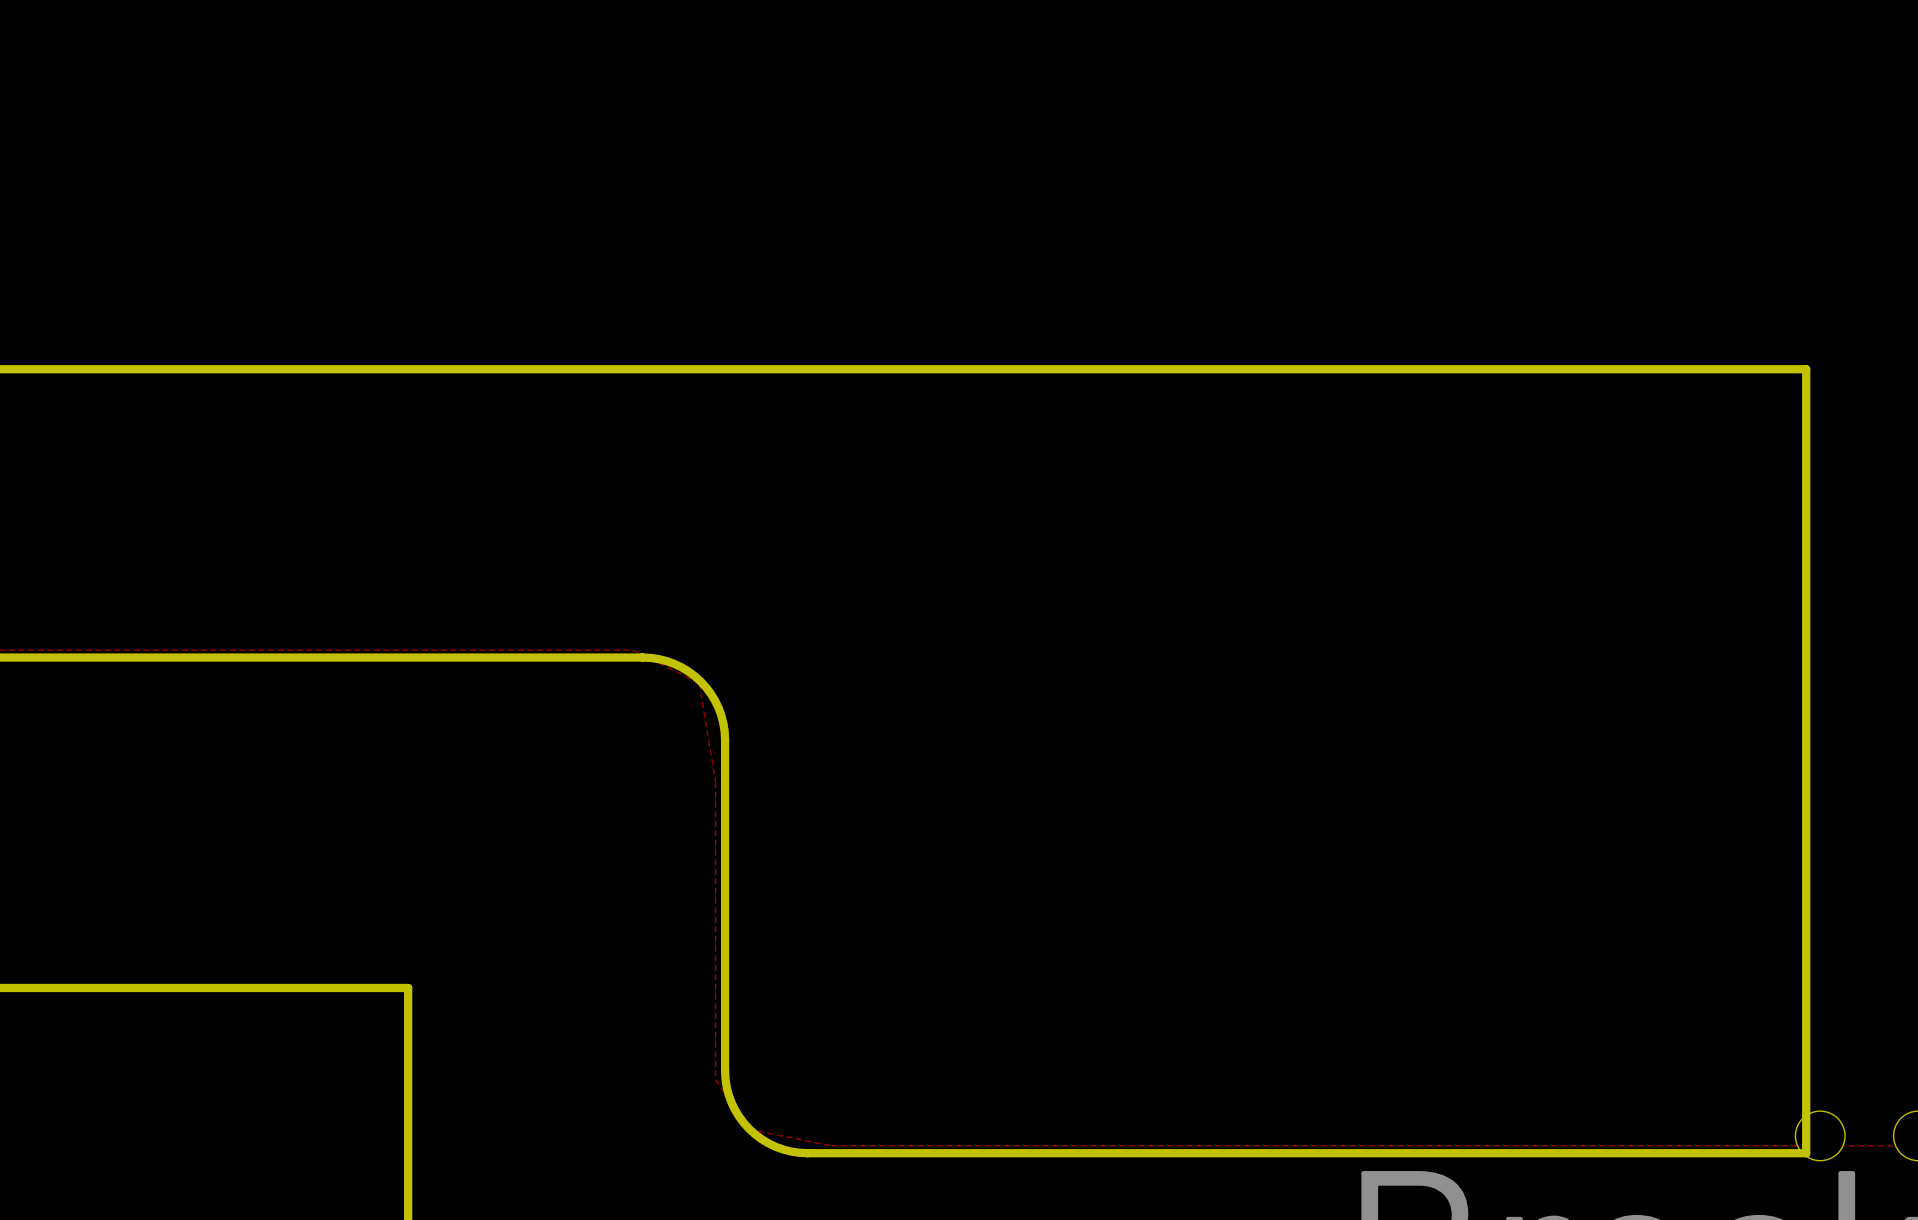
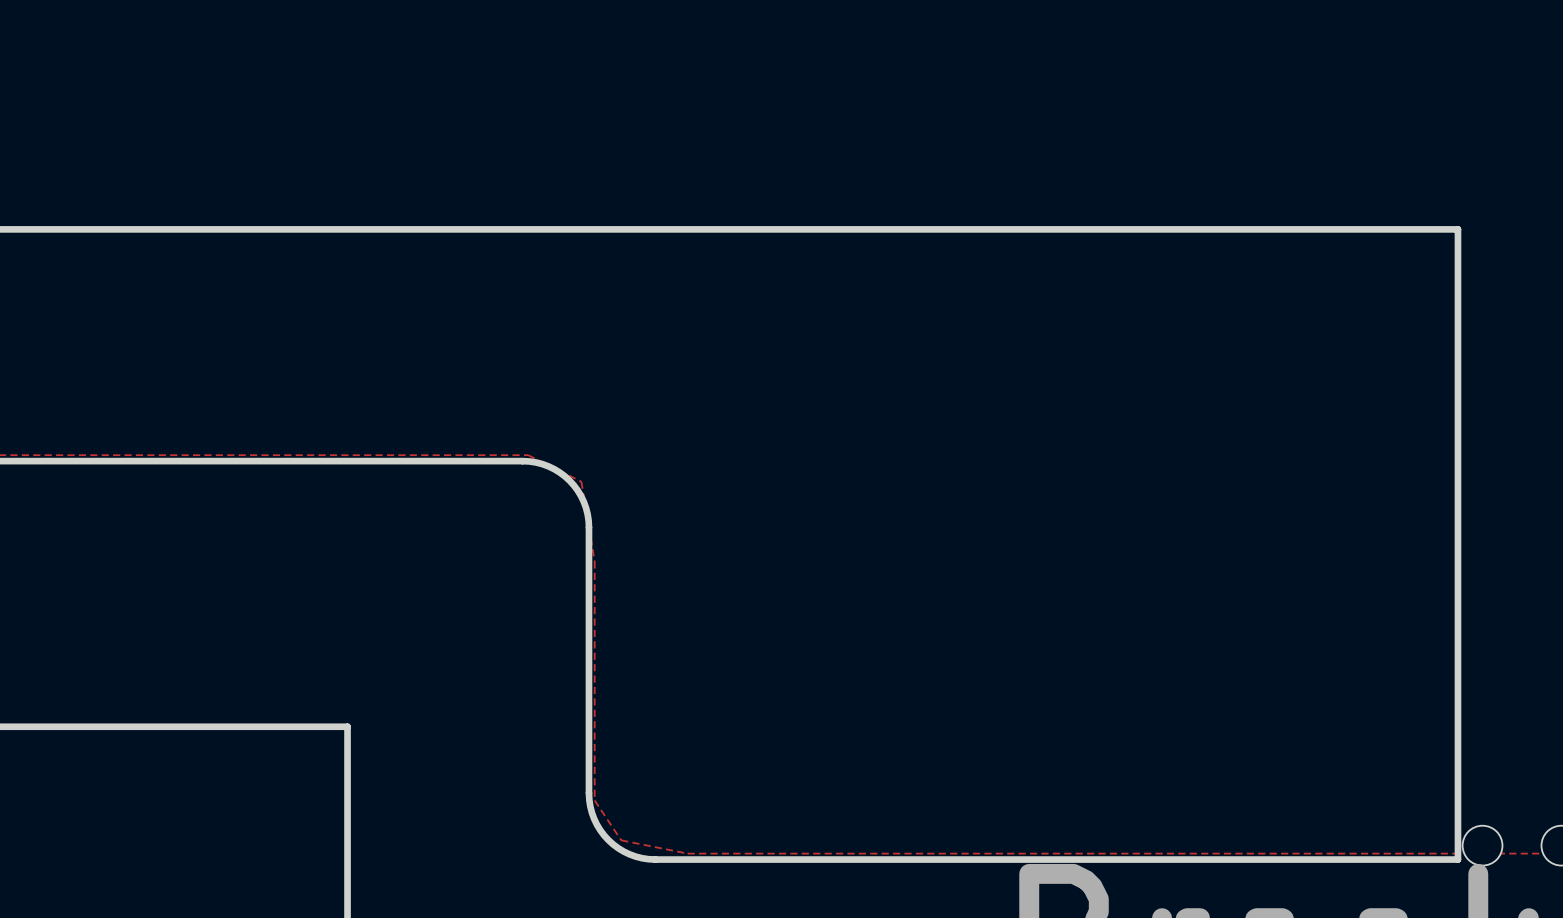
board edge: (1789, 369) (1806, 369) (1806, 1153) (1789, 1153) -> (1457, 229) (1457, 859)
board edge: (625, 657) (659, 659) (681, 667) (695, 676) (706, 687) (718, 707) (723, 723) (725, 740) (725, 1070) (726, 1087) (735, 1109) (743, 1123) (755, 1134) (768, 1143) (783, 1149) (807, 1153) -> (522, 461) (542, 464) (564, 476) (580, 495) (587, 514) (588, 793) (594, 818) (604, 835) (623, 851) (642, 858) (668, 859)

